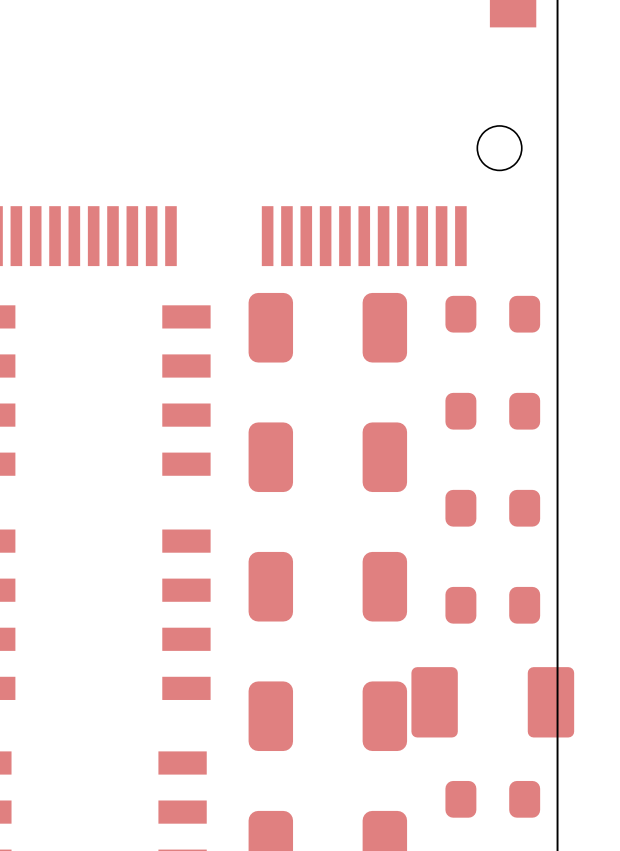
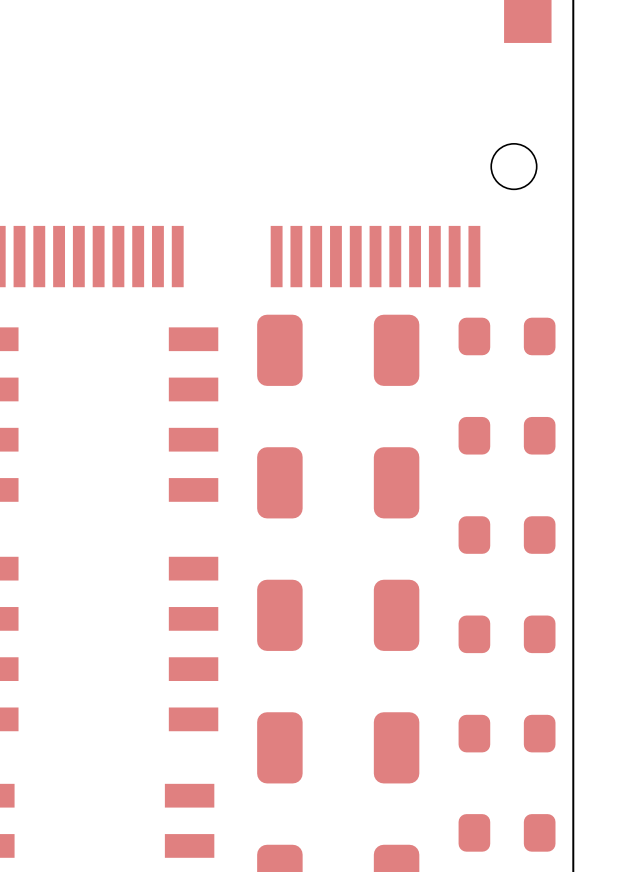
part footprint: [411, 667, 575, 738] -> [458, 714, 556, 753]

